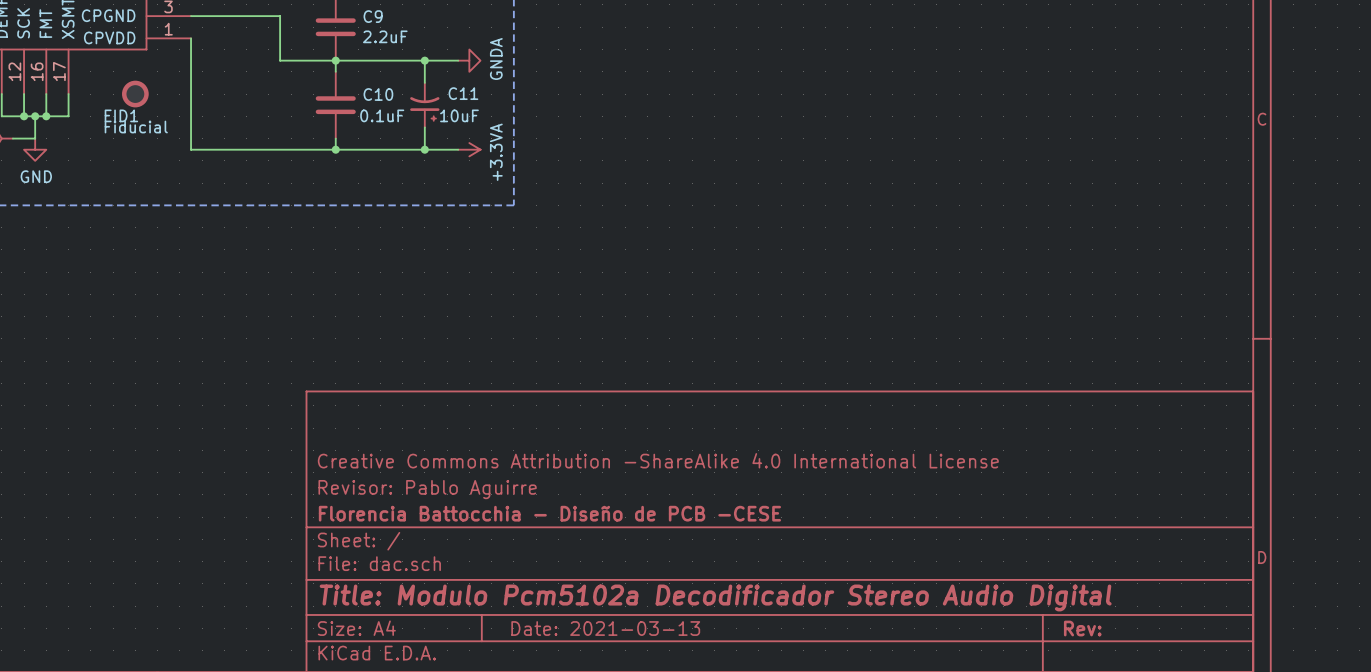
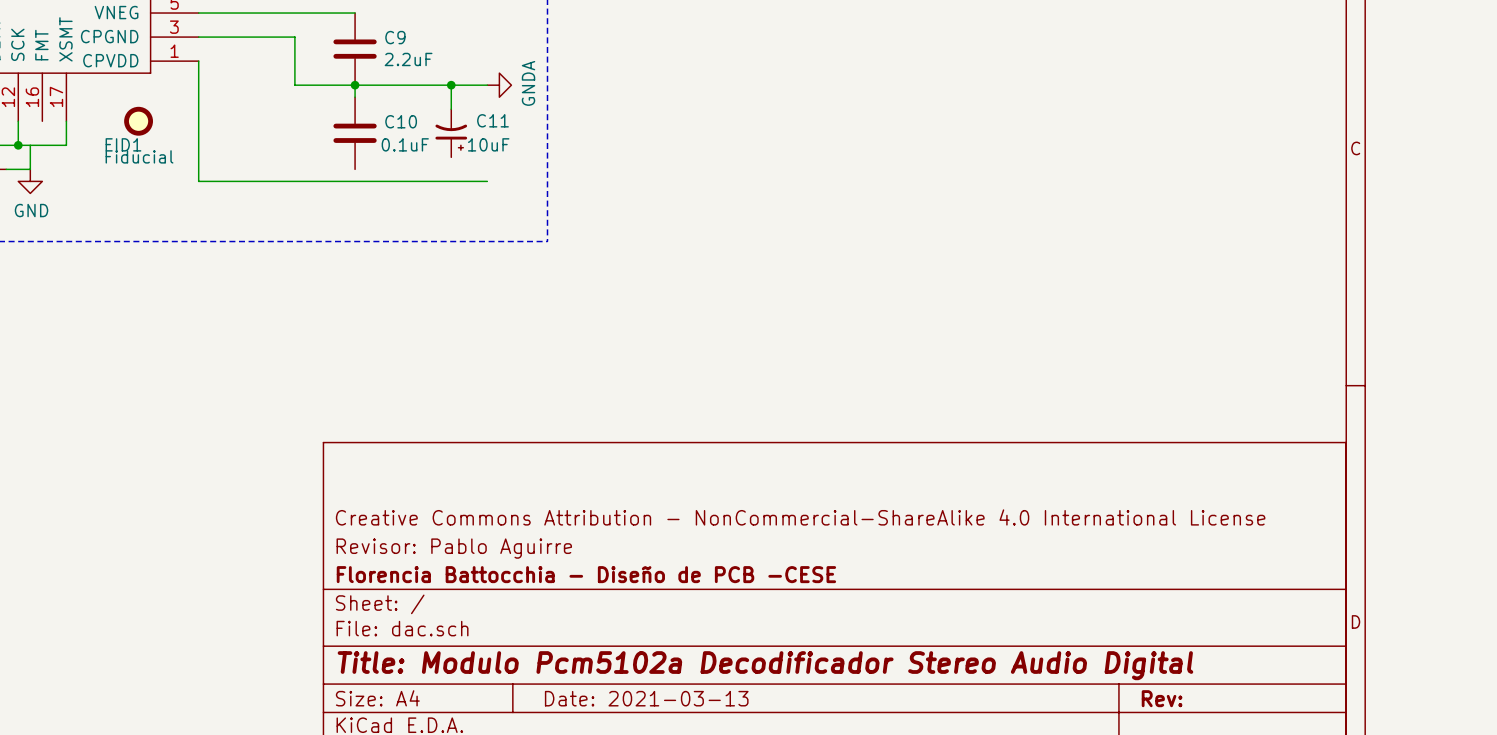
wire: (46, 94) (46, 116) -> none
junction: (35, 116) -> none
junction: (46, 116) -> none
wire: (424, 127) (424, 149) -> none
wire: (335, 138) (335, 149) -> none
junction: (335, 149) -> none
junction: (424, 149) -> none
power symbol: +3.3VA (469, 149) -> none
title block: Creative Commons Attribution -ShareAlike 4.0 International License (658, 460) -> Creative Commons Attribution - NonCommercial-ShareAlike 4.0 International License (800, 517)

